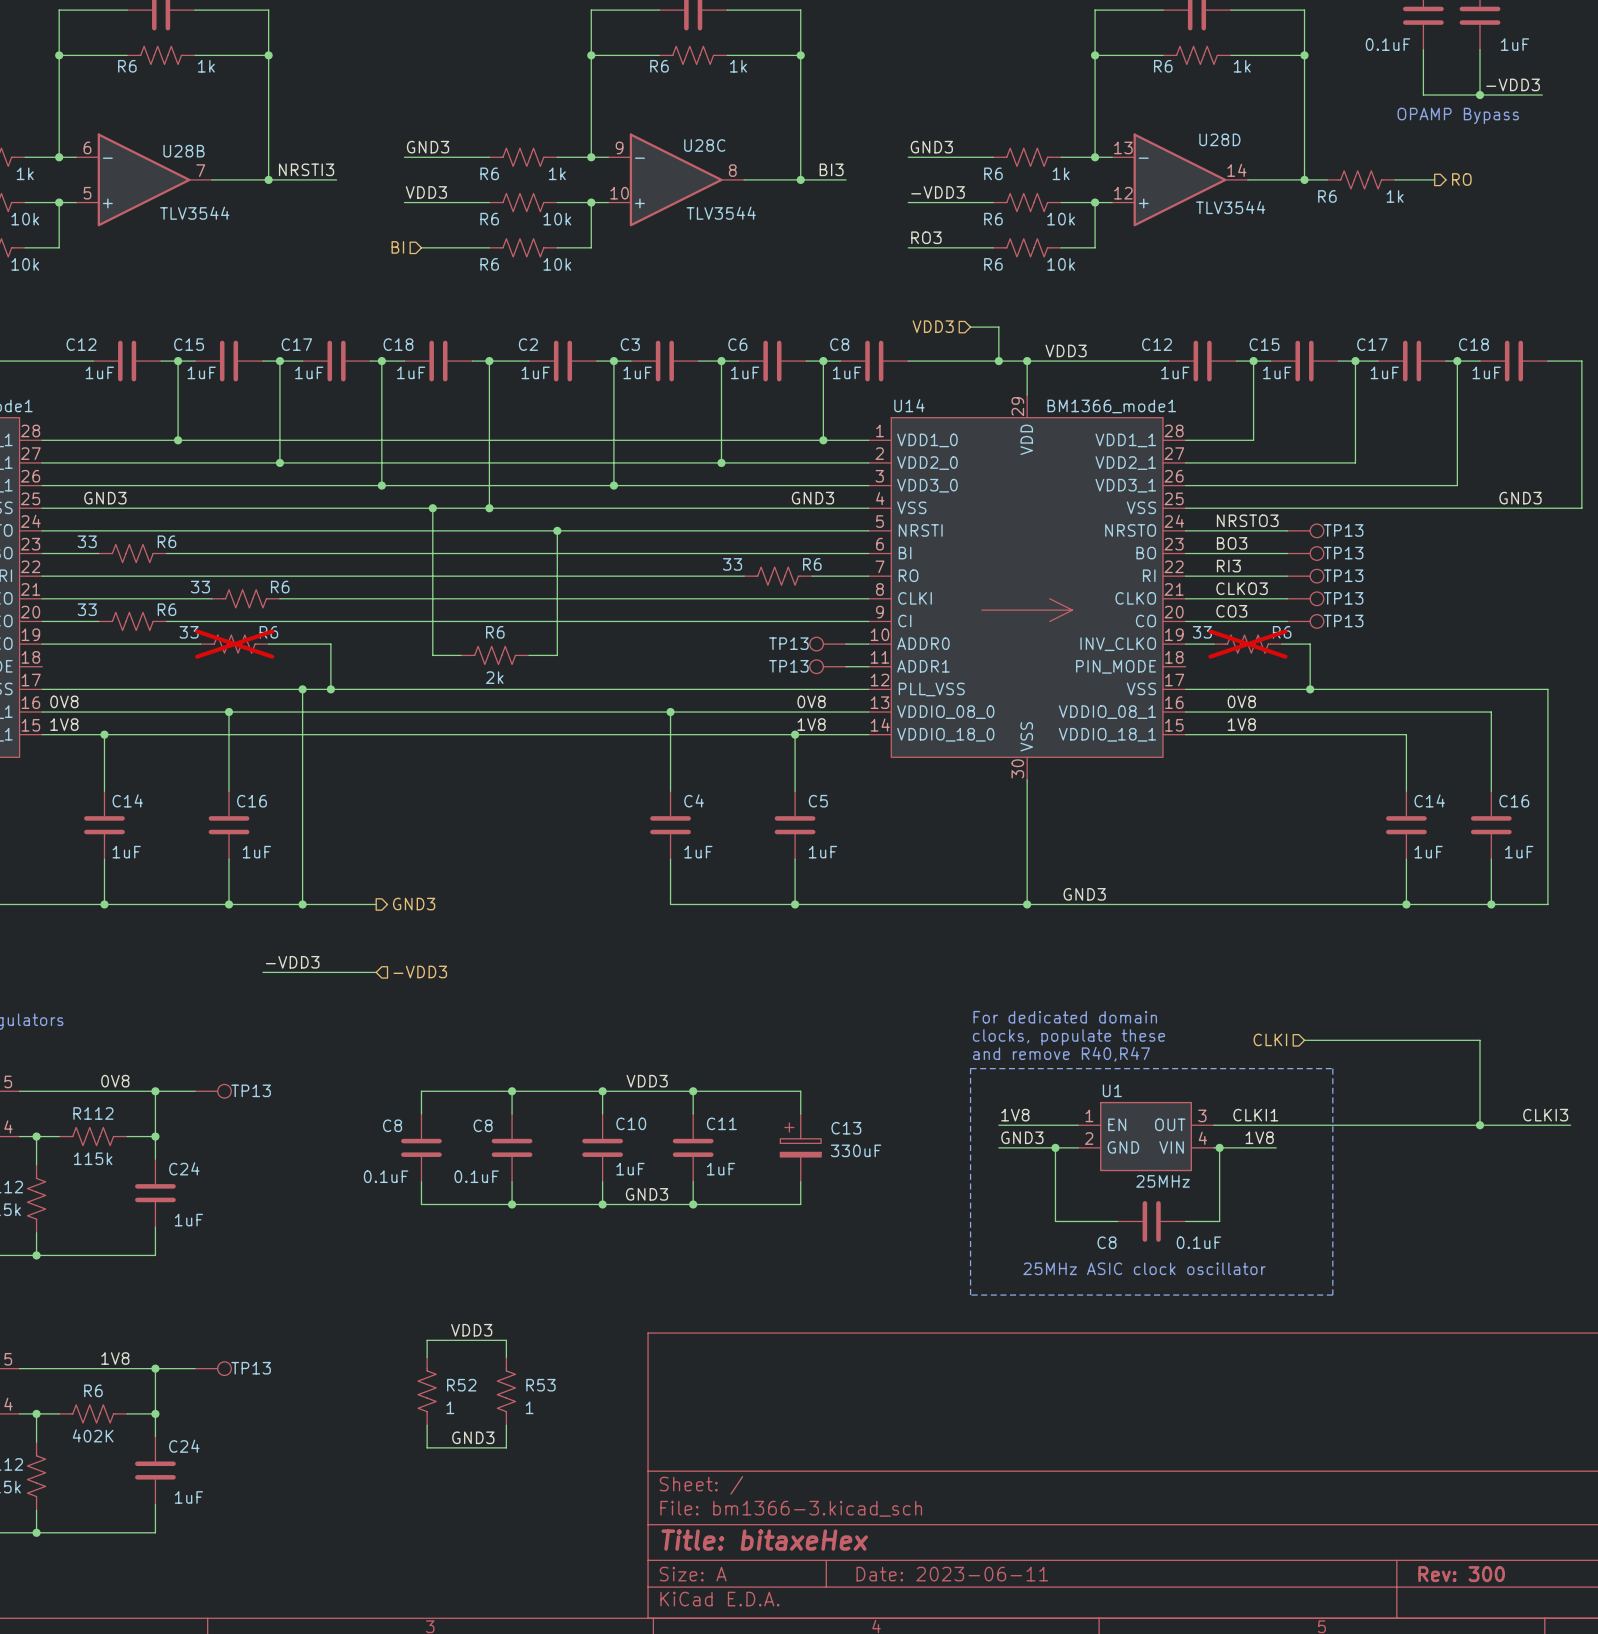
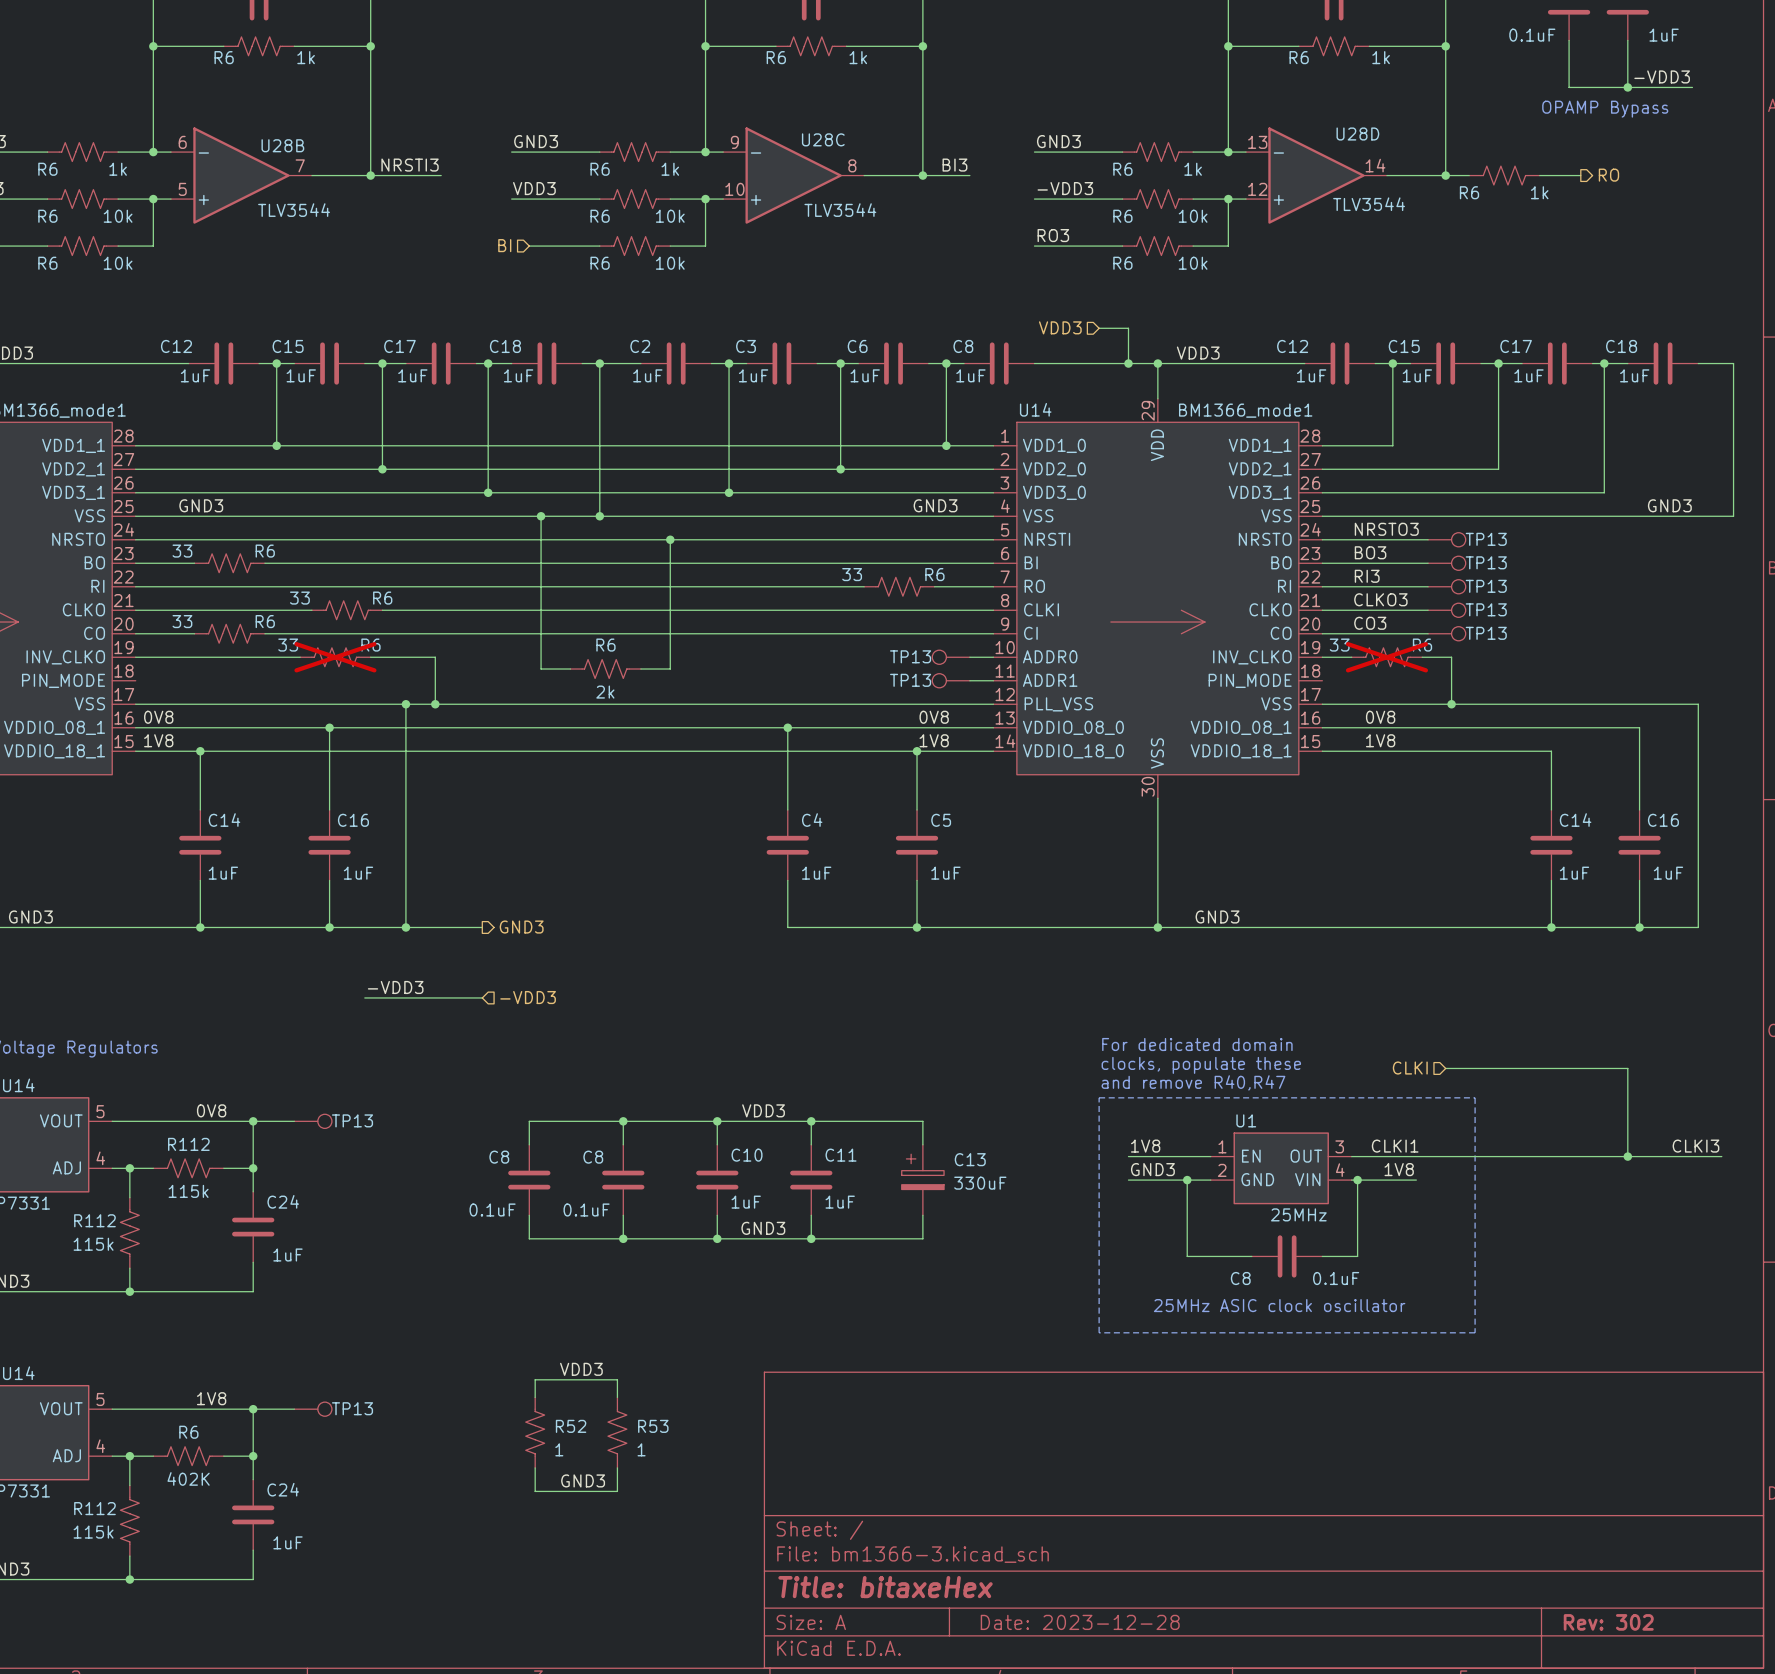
title block: Date: 2023-06-11 (952, 1574) -> Date: 2023-12-28 (1080, 1622)
title block: Rev: 300 (1461, 1574) -> Rev: 302 (1608, 1622)

